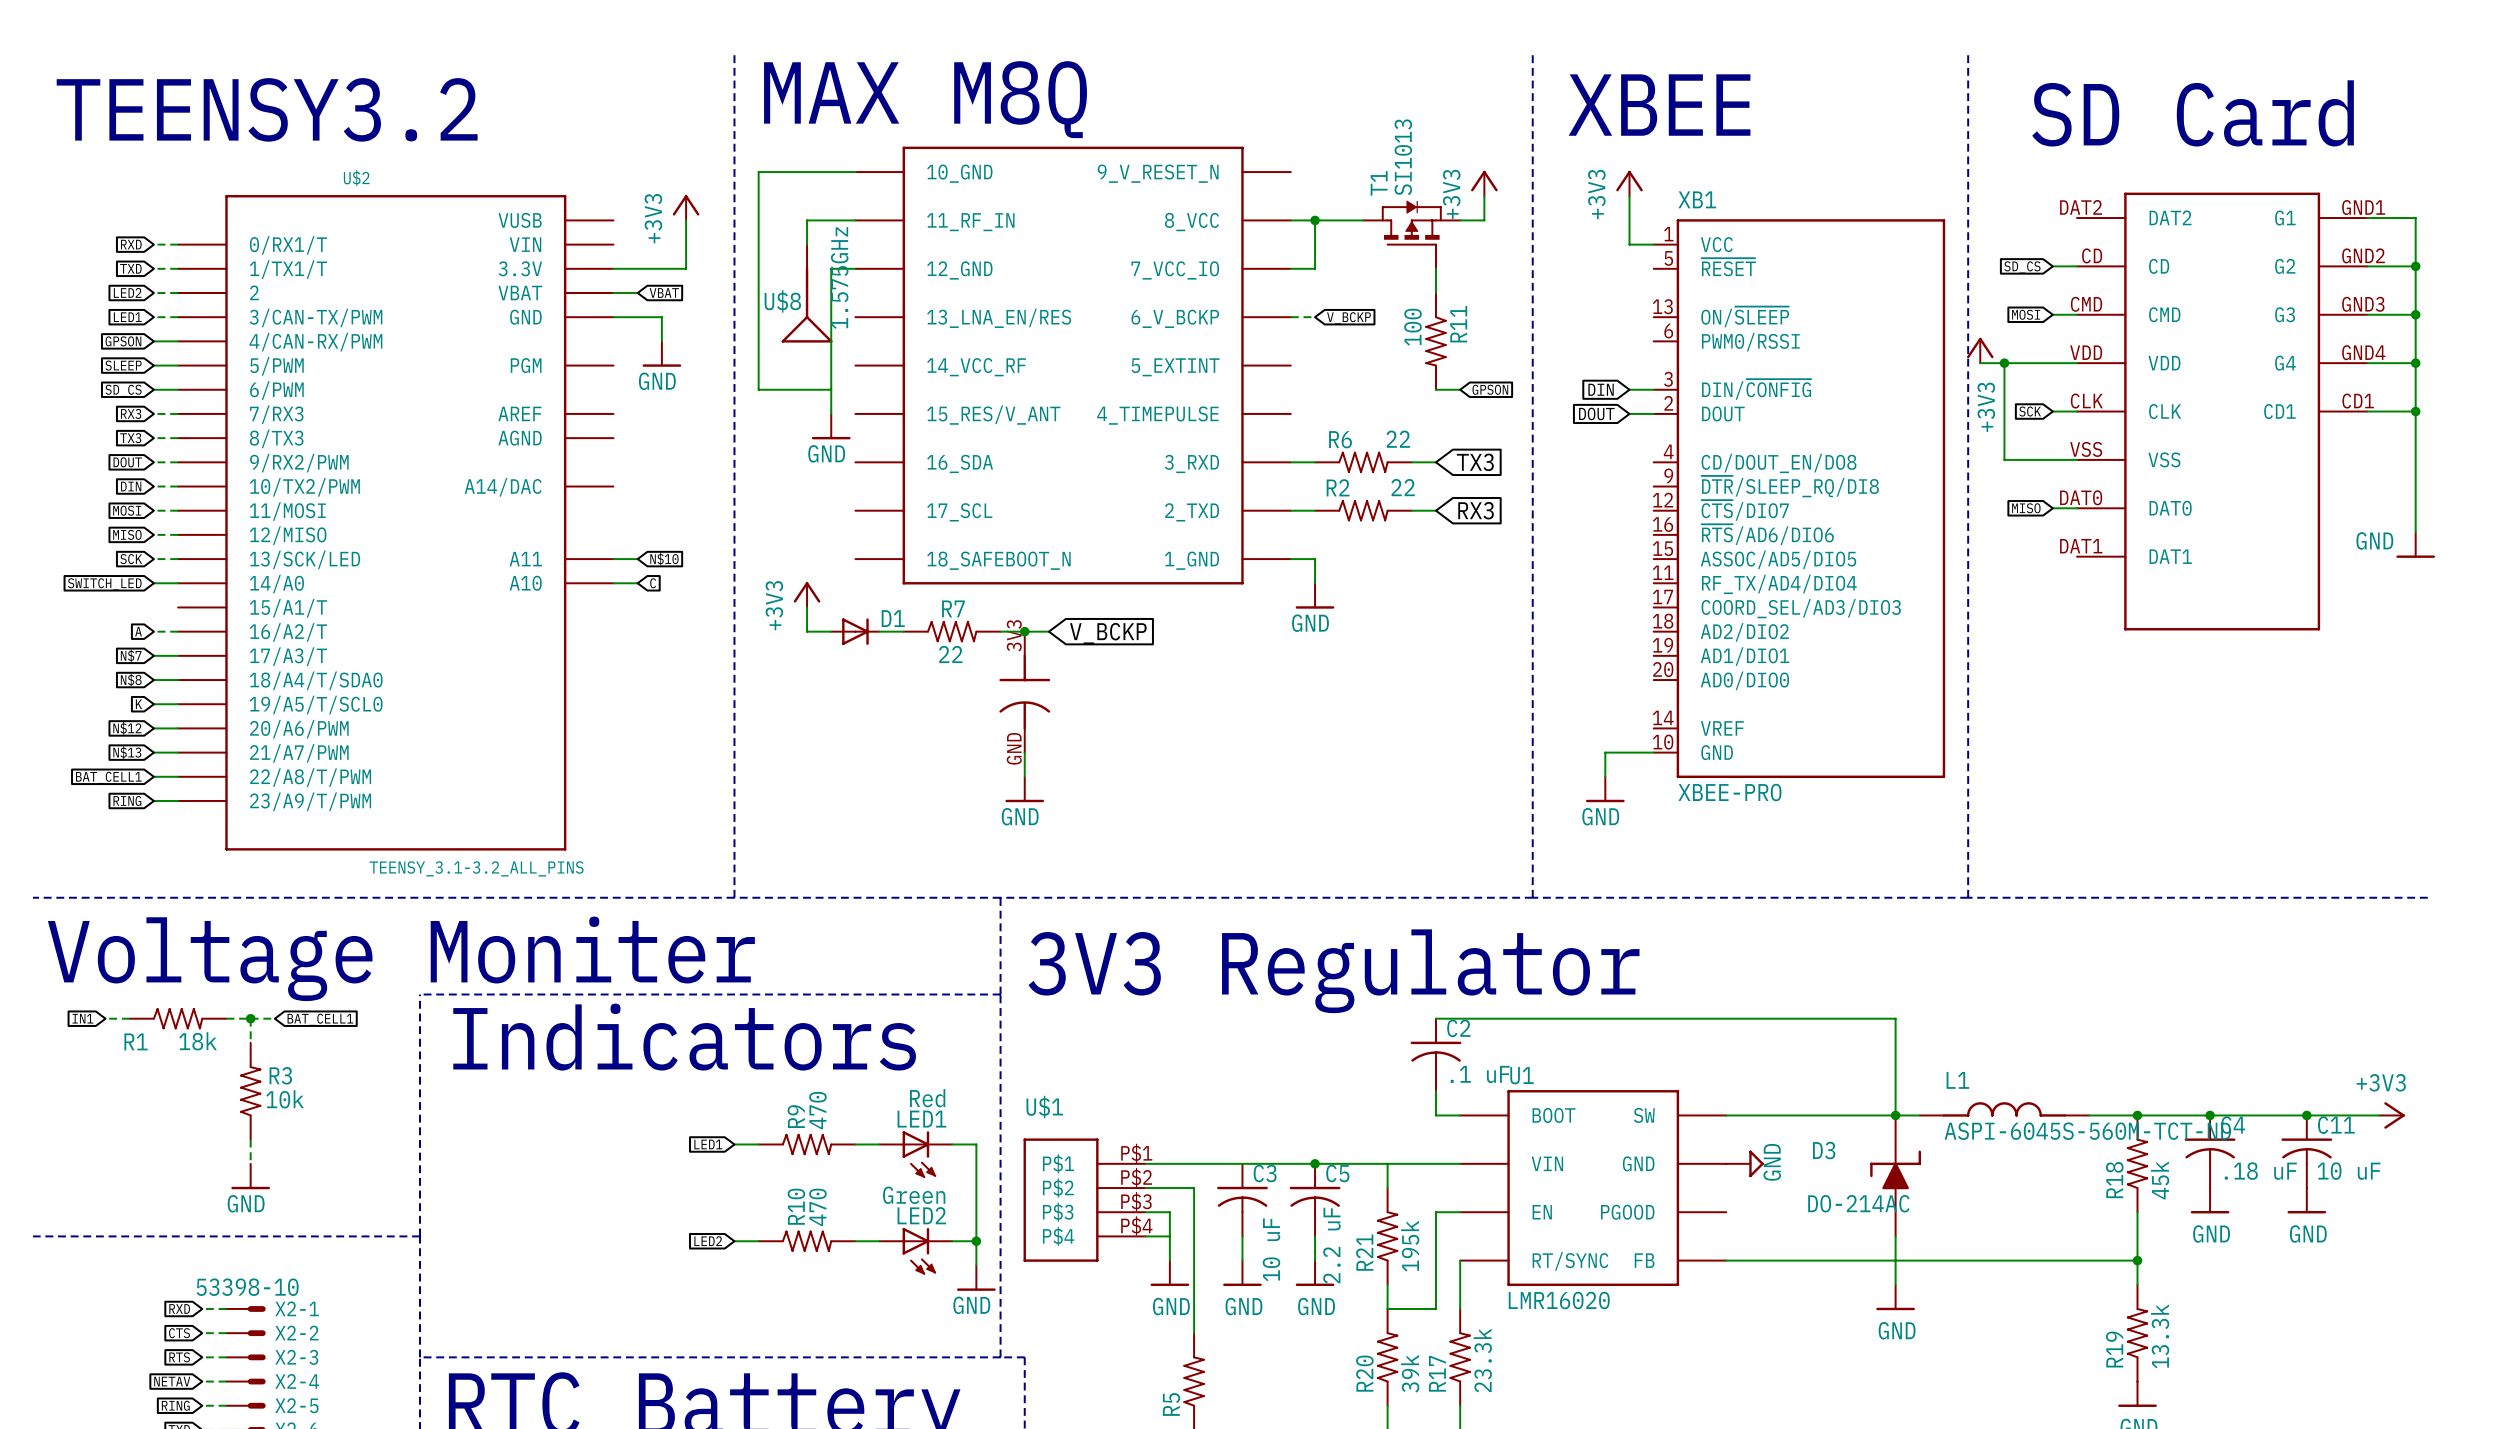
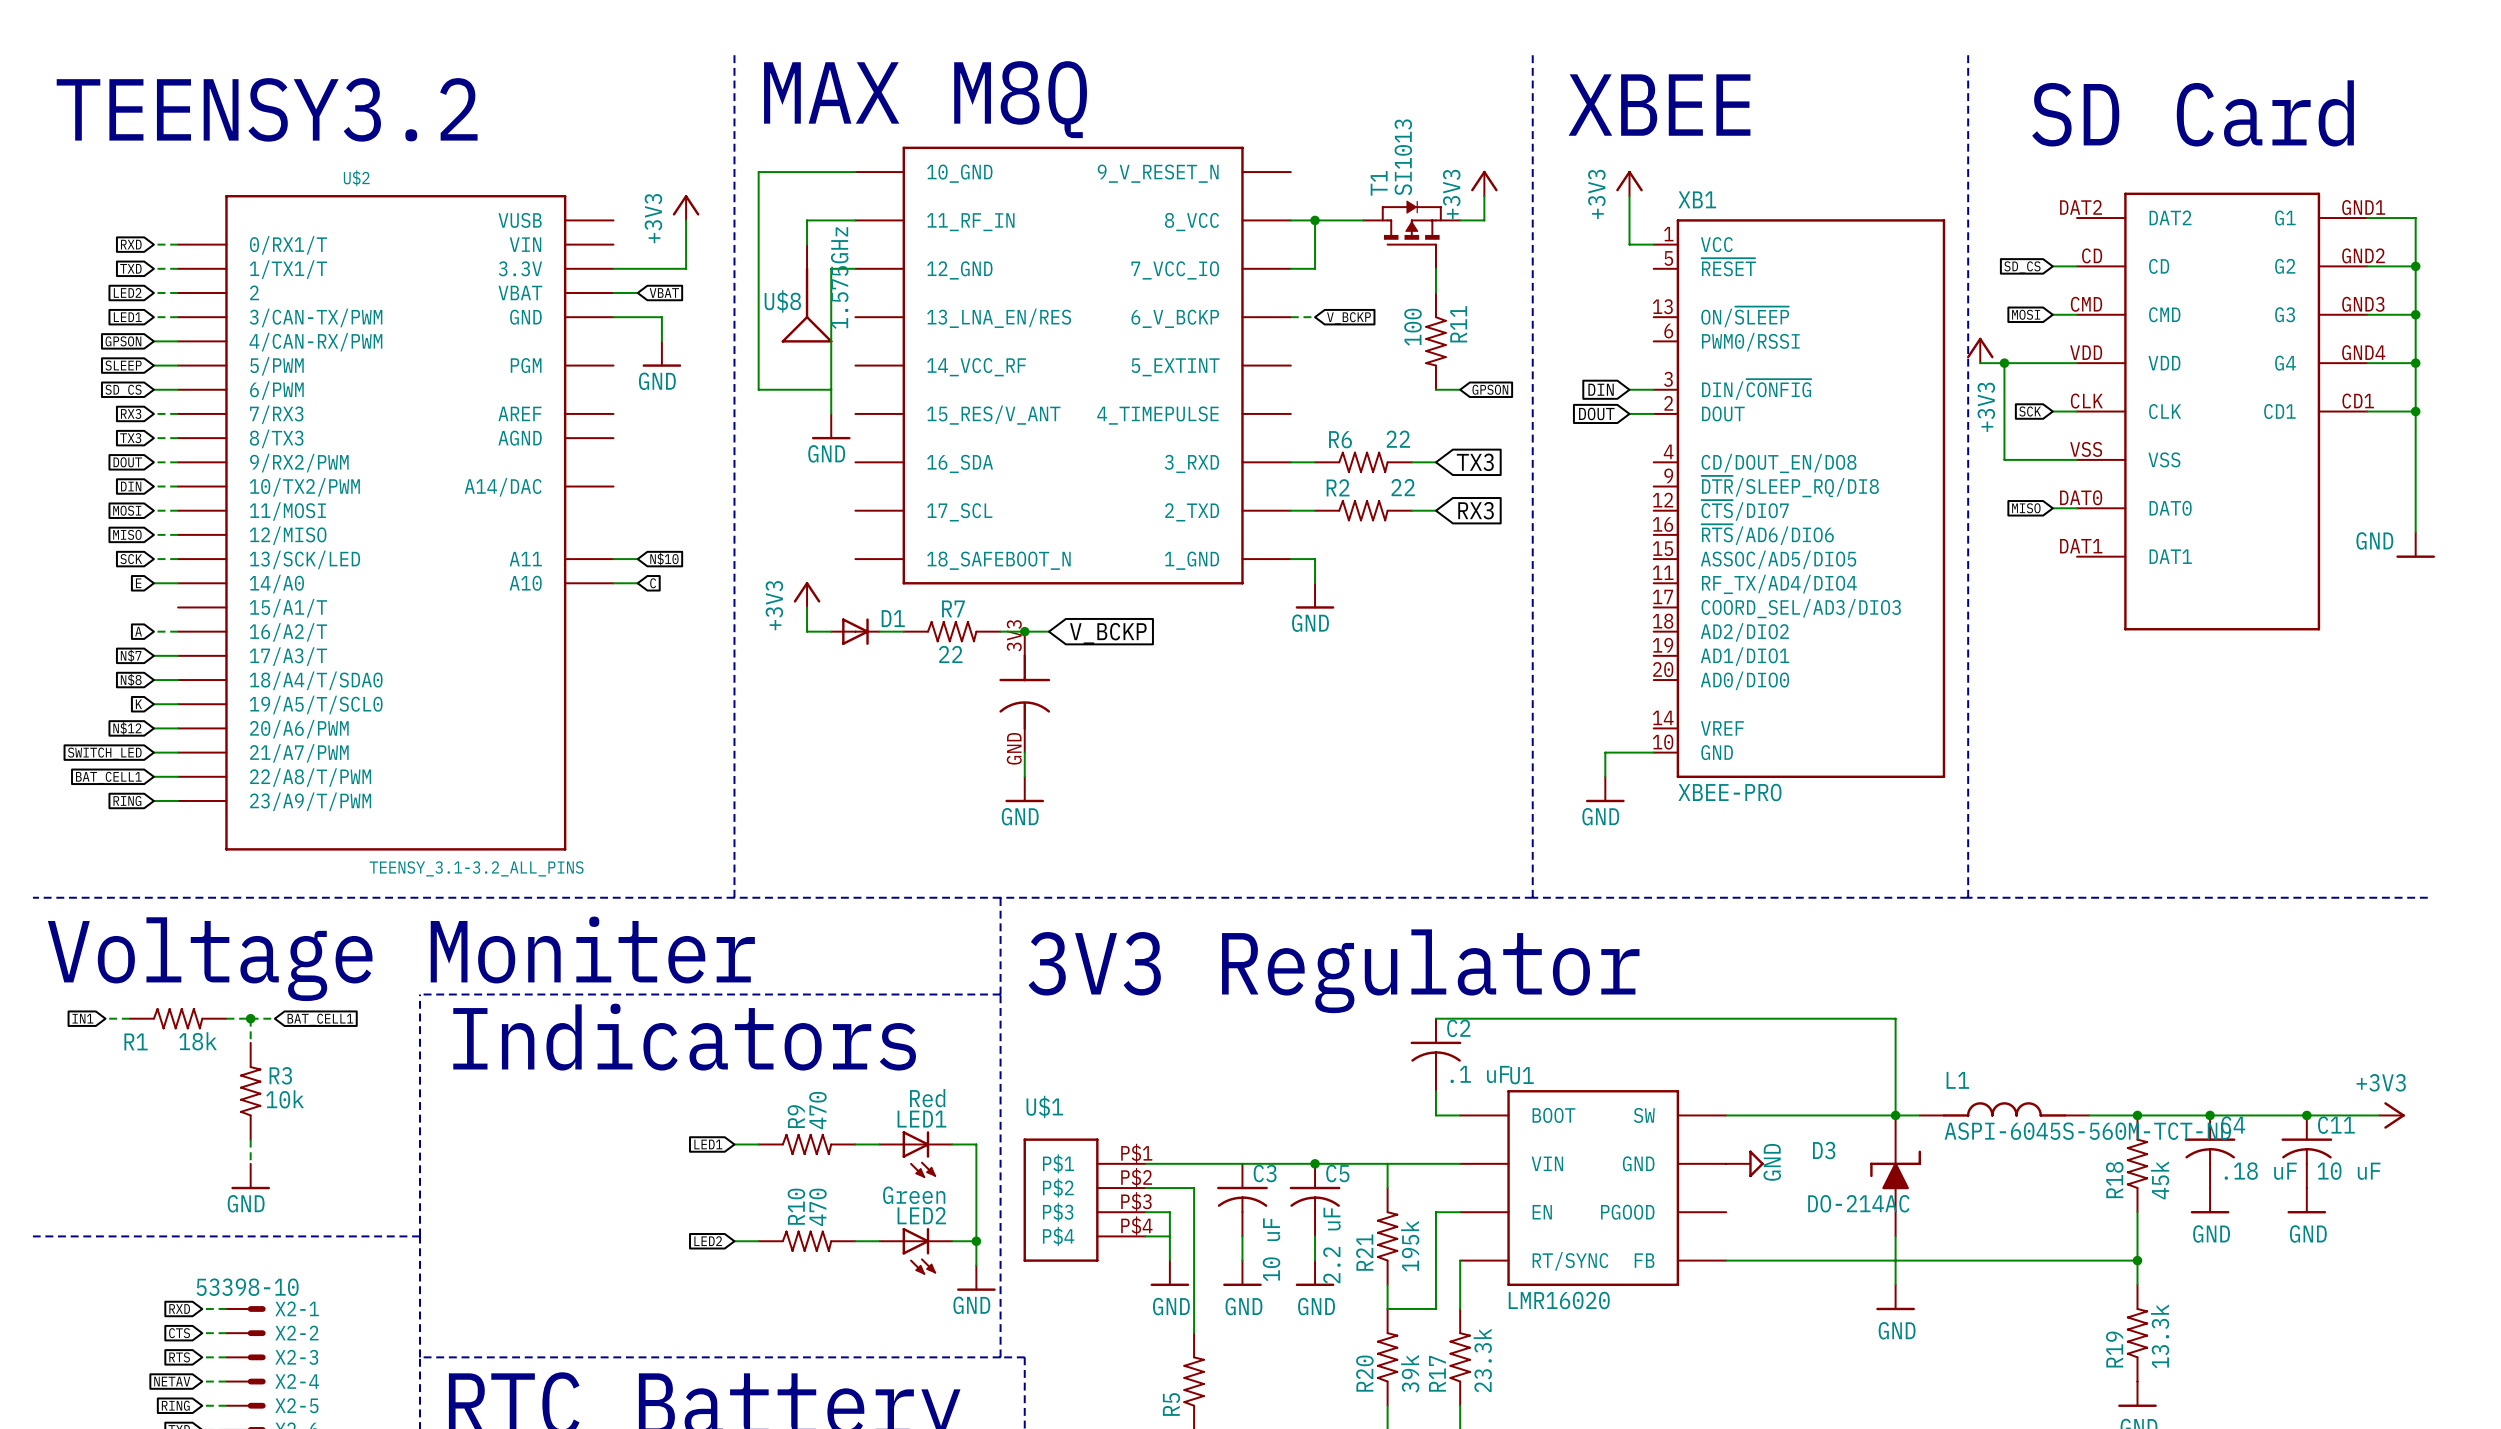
global label: SWITCH_LED (104, 584) -> E (138, 583)
global label: N$13 (127, 752) -> SWITCH_LED (104, 753)

